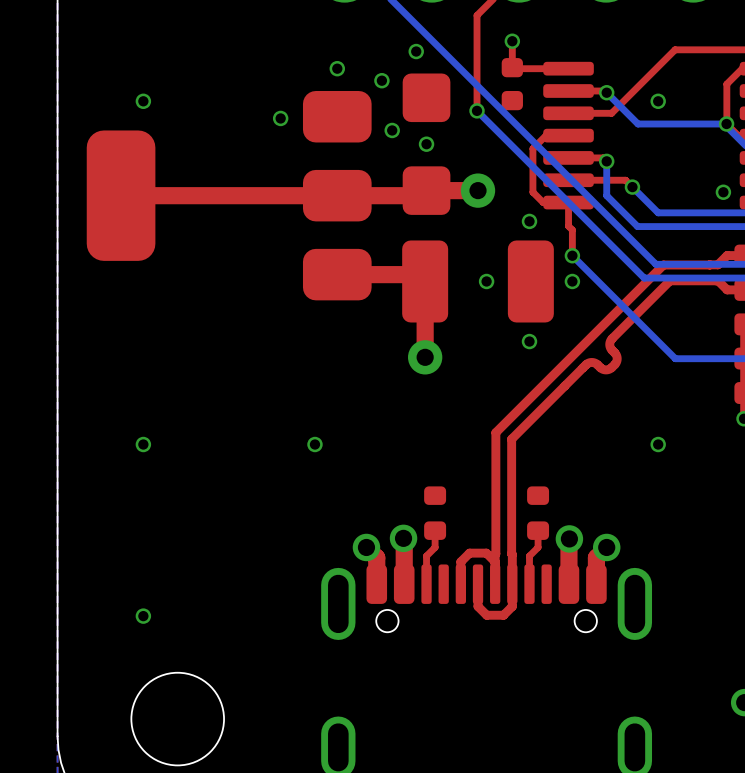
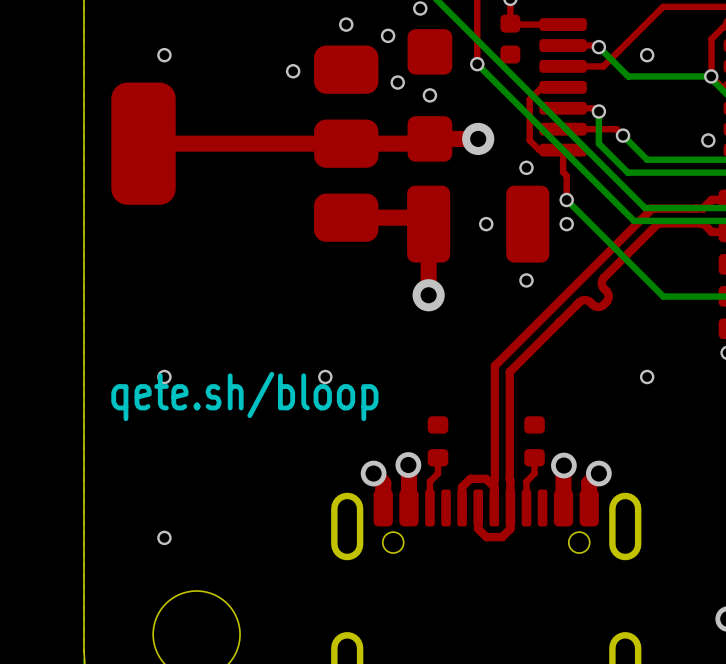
text: none -> qete.sh/bloop (244, 396)

